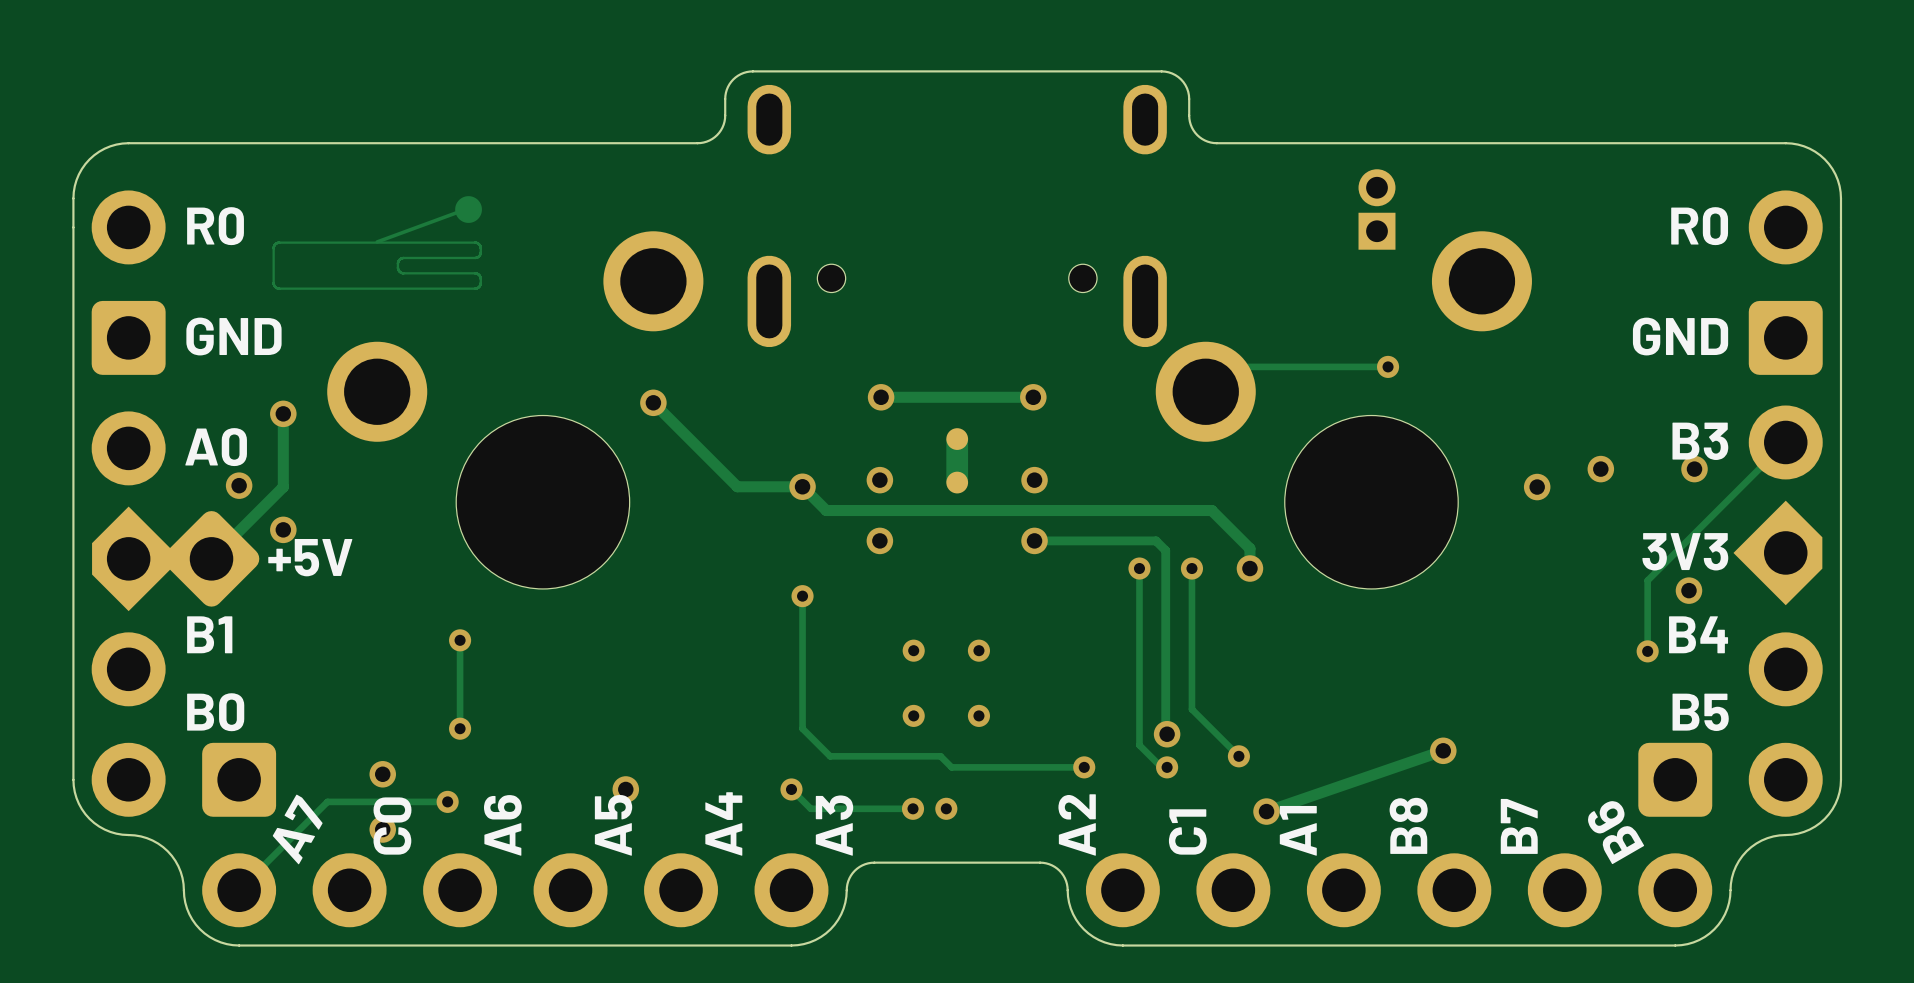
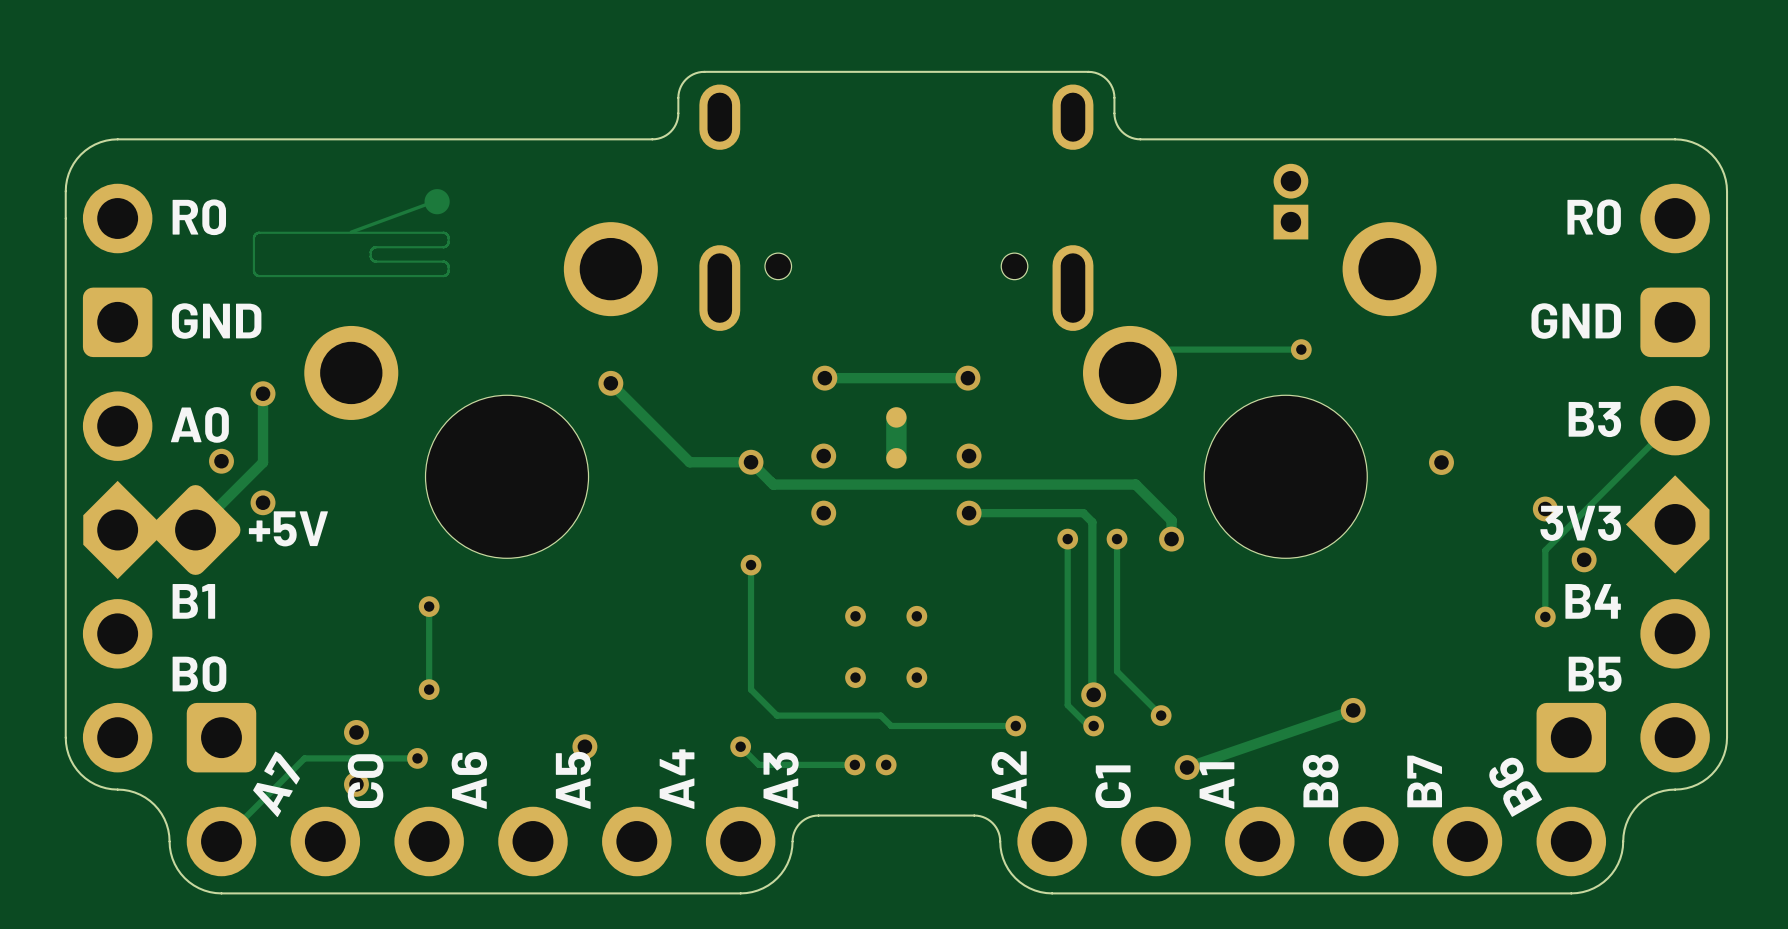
via: (1600, 469) -> none
via: (1694, 469) -> none
via: none -> (1545, 509)

